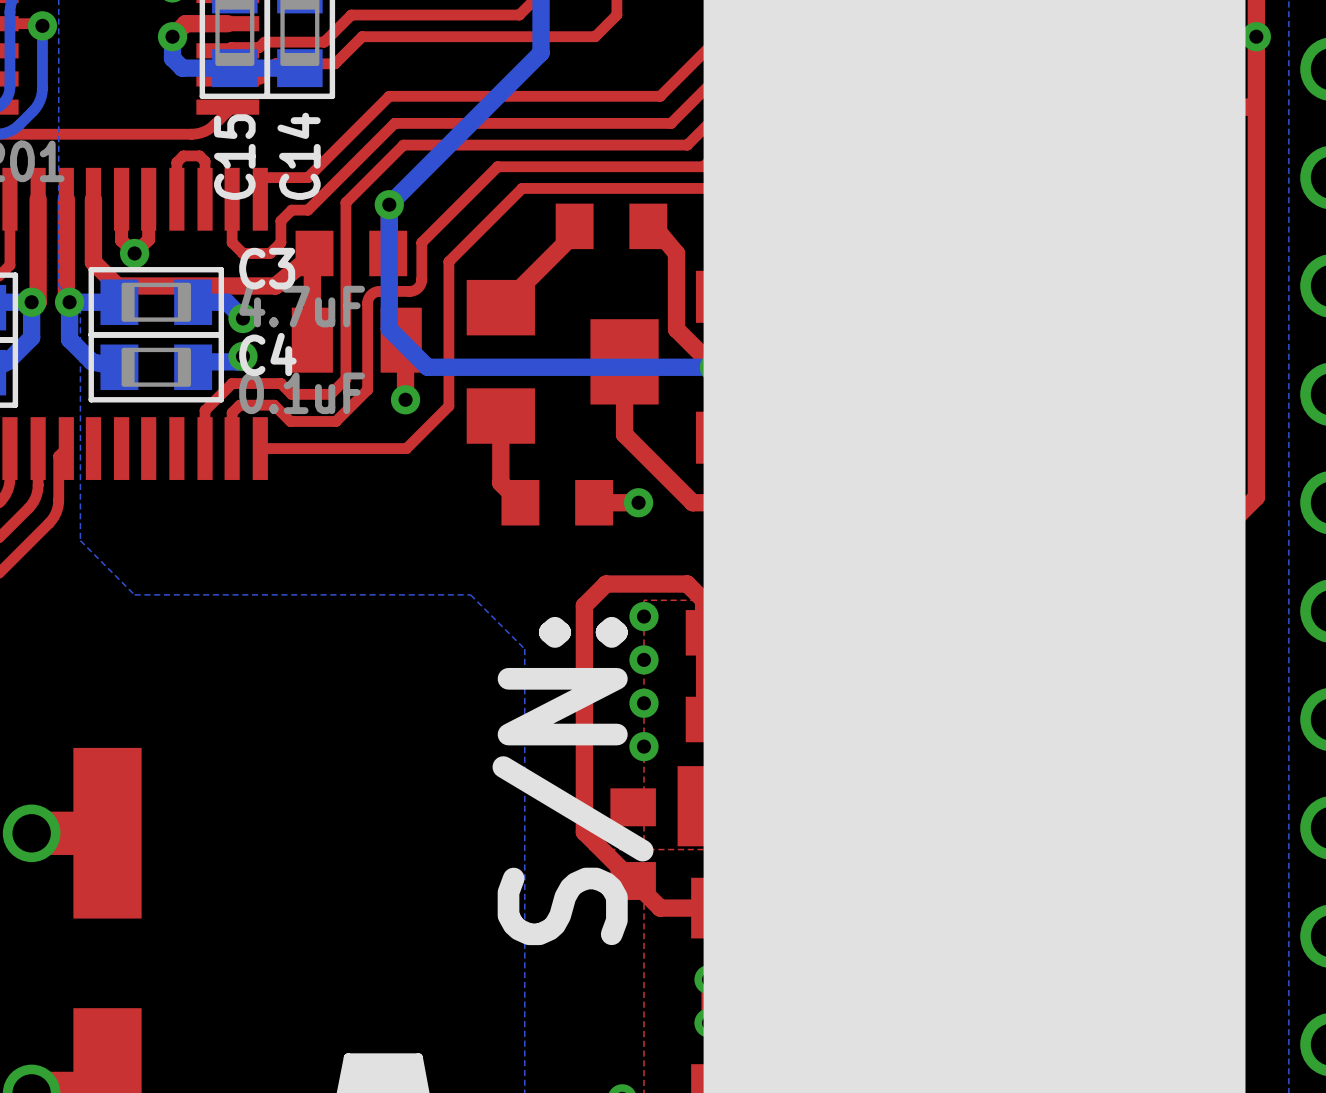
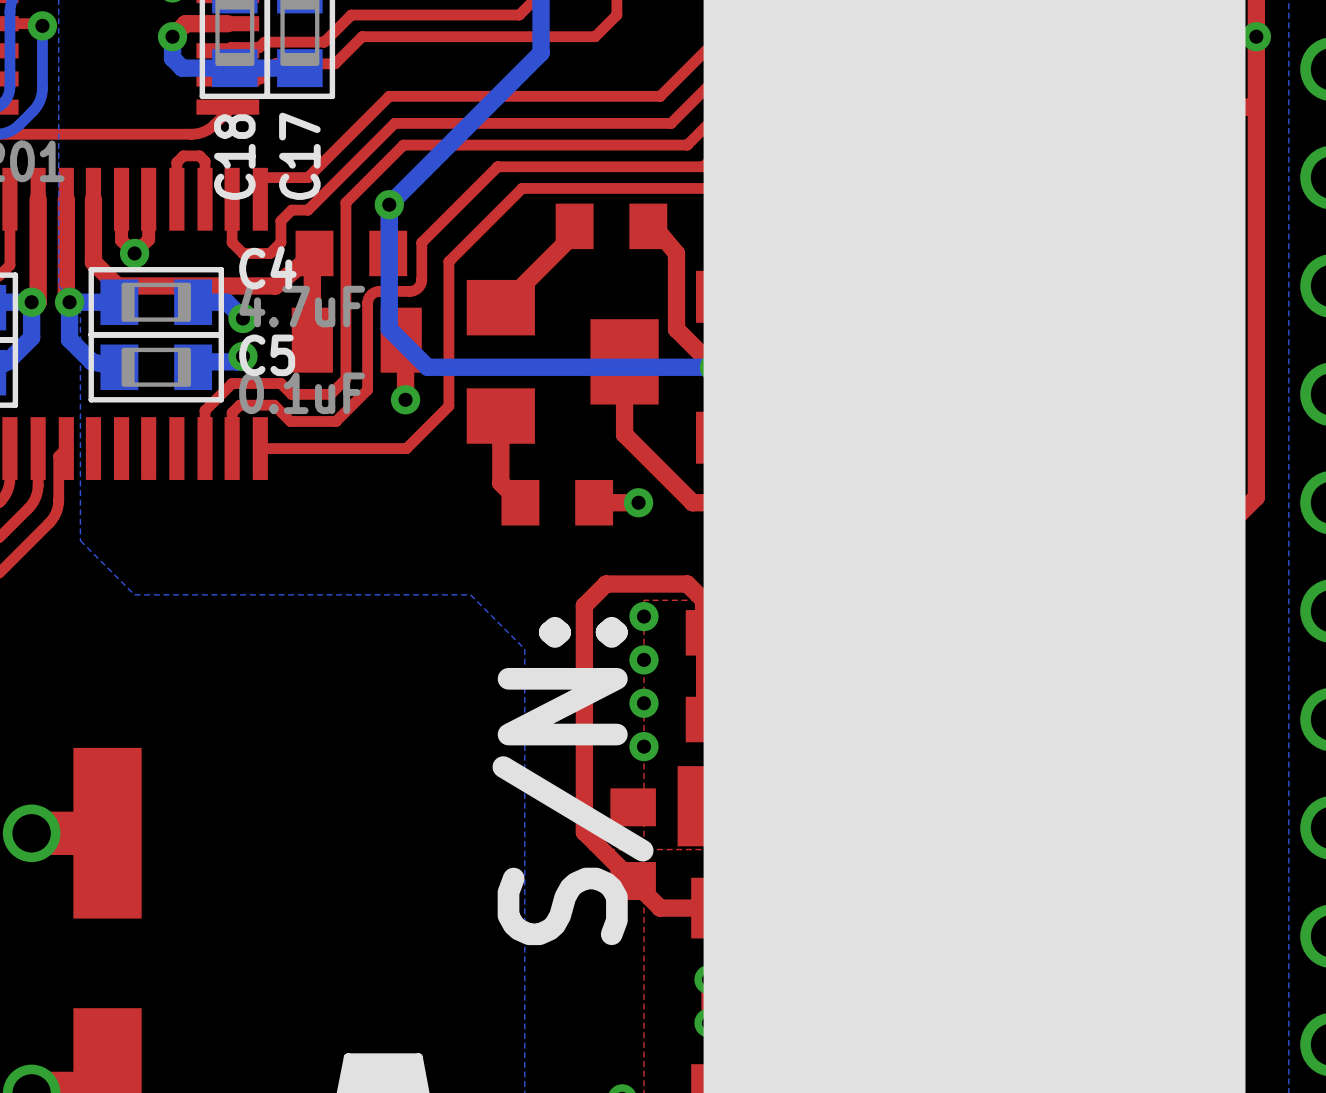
C14 name: C14 (299, 156) -> C17 (299, 156)
C15 name: C15 (234, 157) -> C18 (234, 157)
C3 name: C3 (267, 268) -> C4 (267, 267)
C4 name: C4 (267, 354) -> C5 (267, 355)

